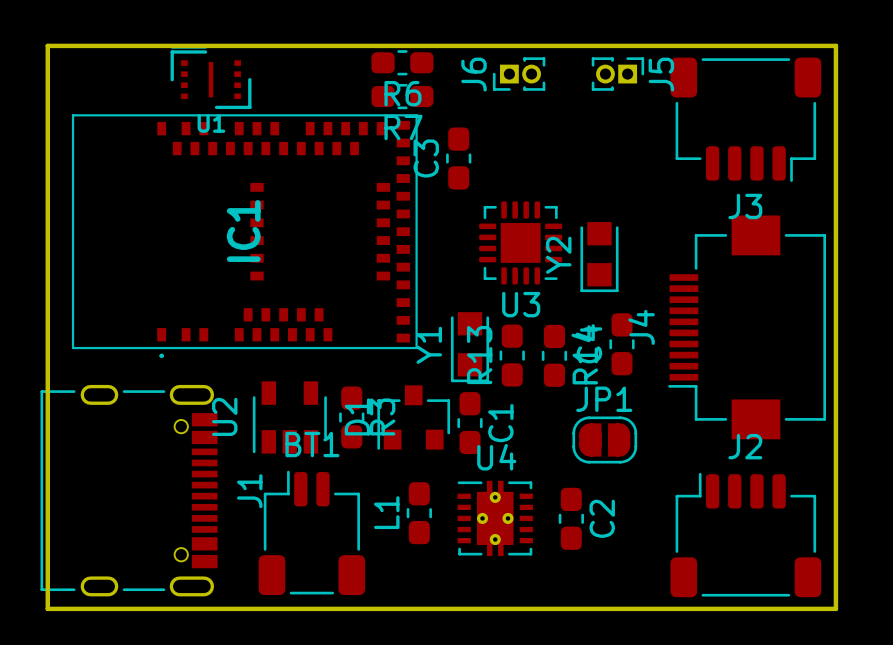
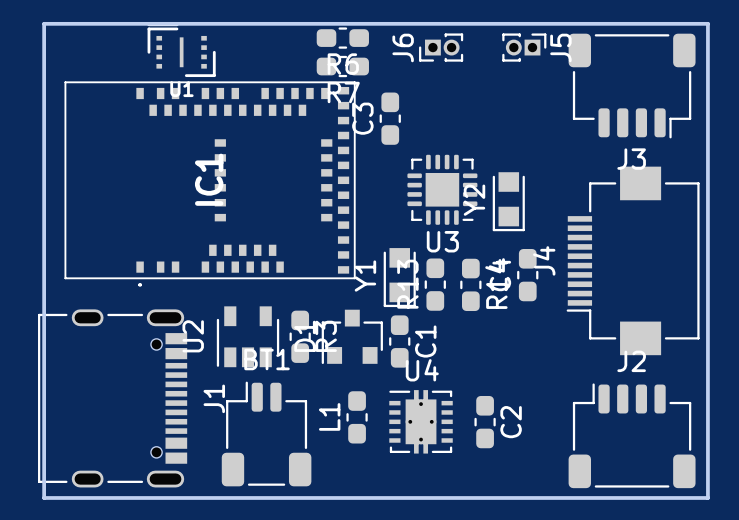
JP1: (604, 439) -> none

